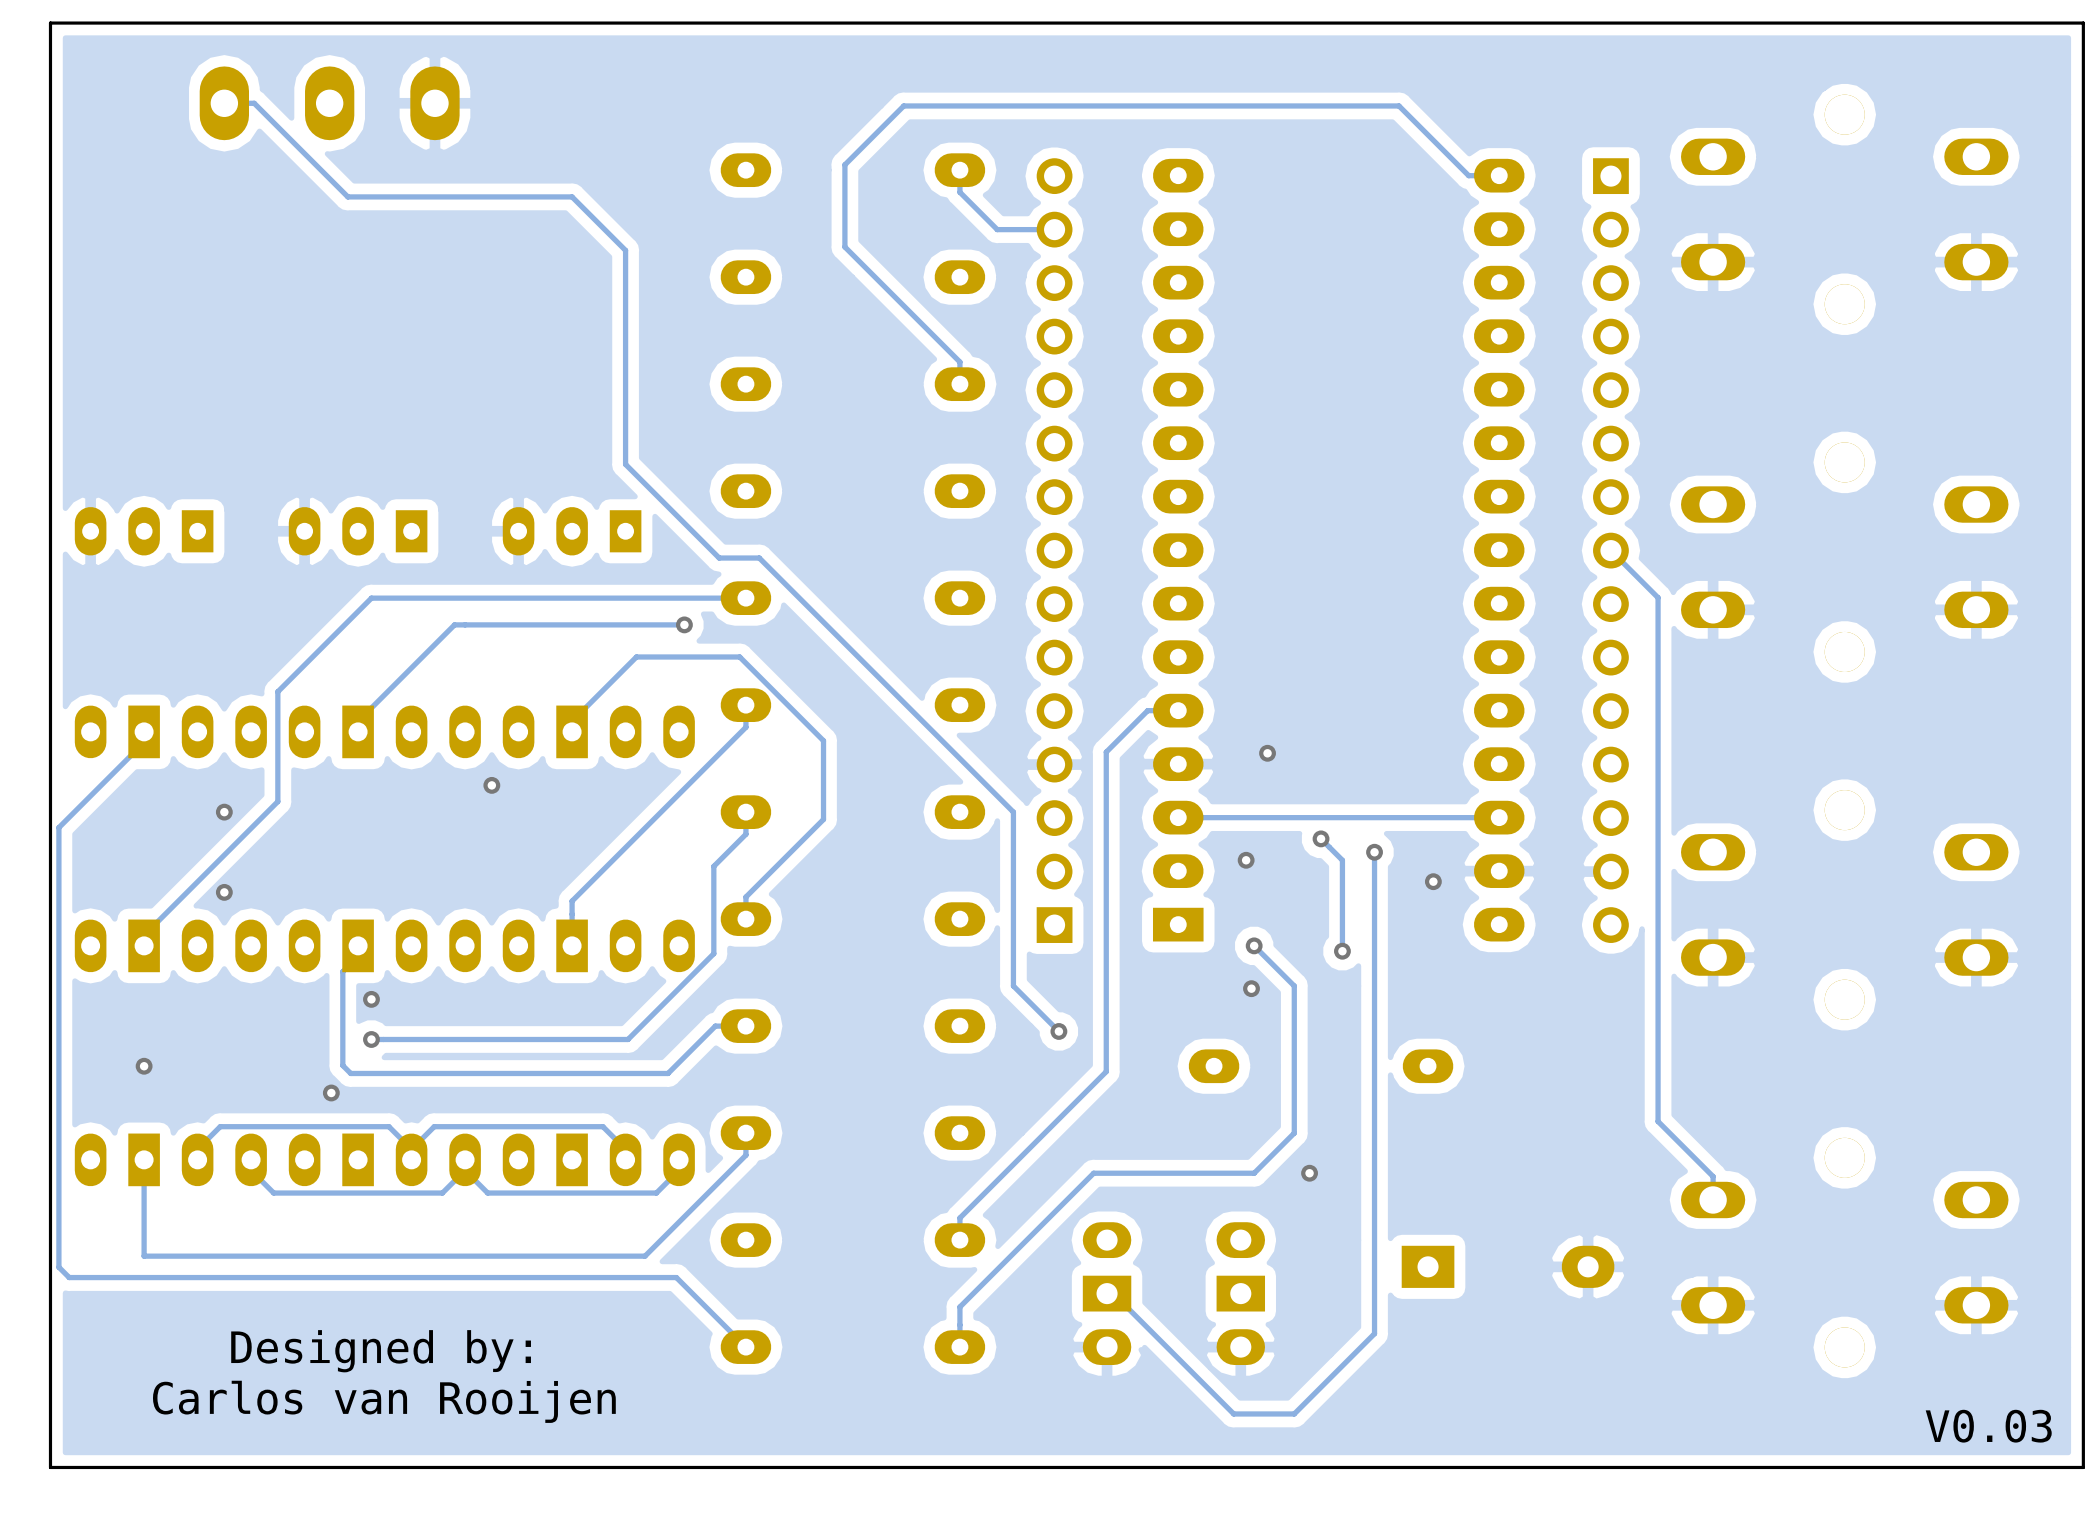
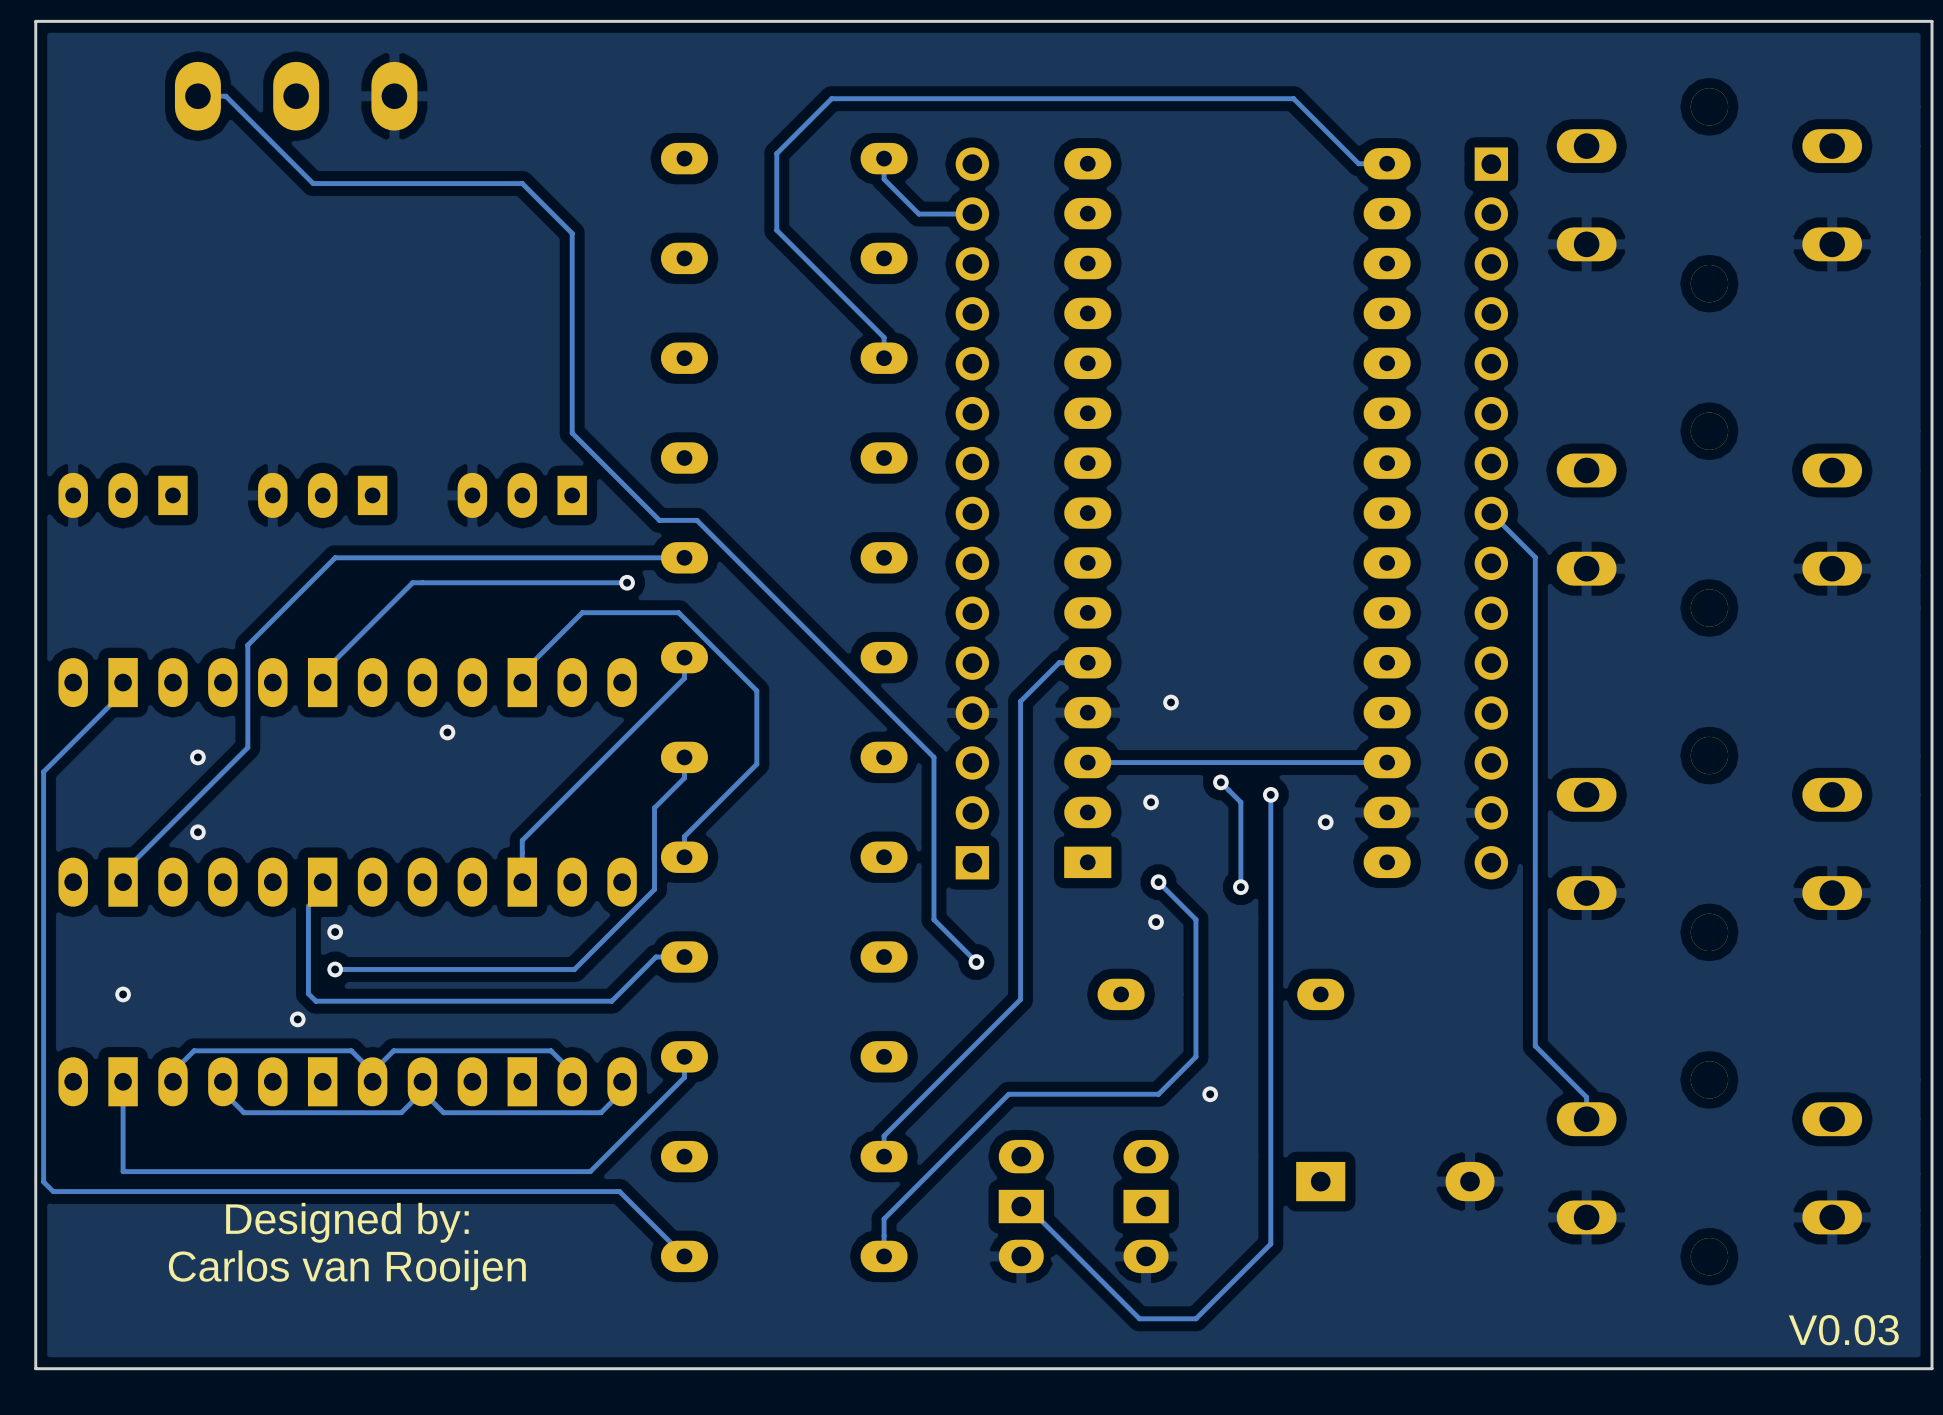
text position: Designed by: (381, 1351) -> Designed by: (347, 1222)
text position: Carlos van Rooijen (384, 1401) -> Carlos van Rooijen (347, 1270)

